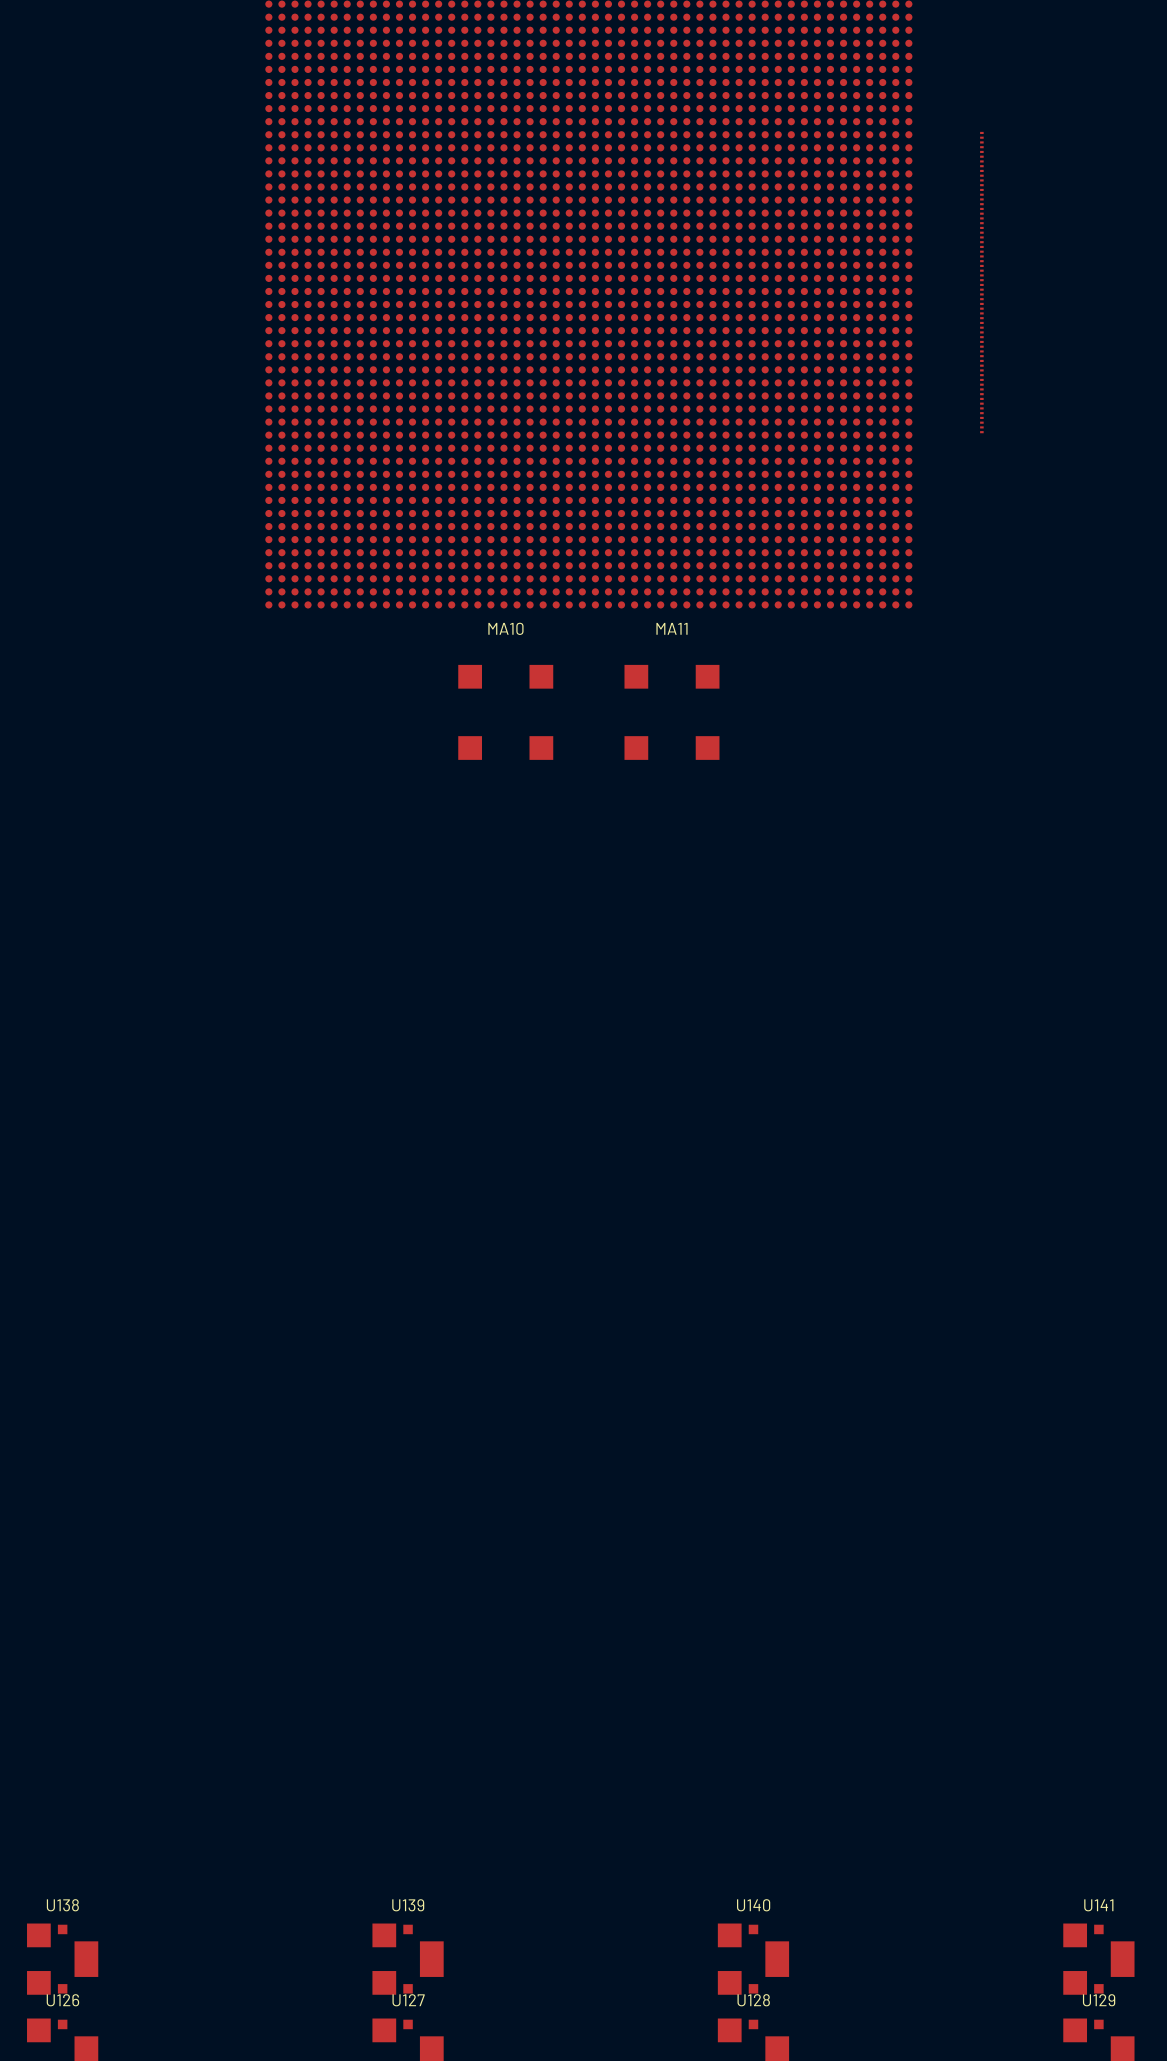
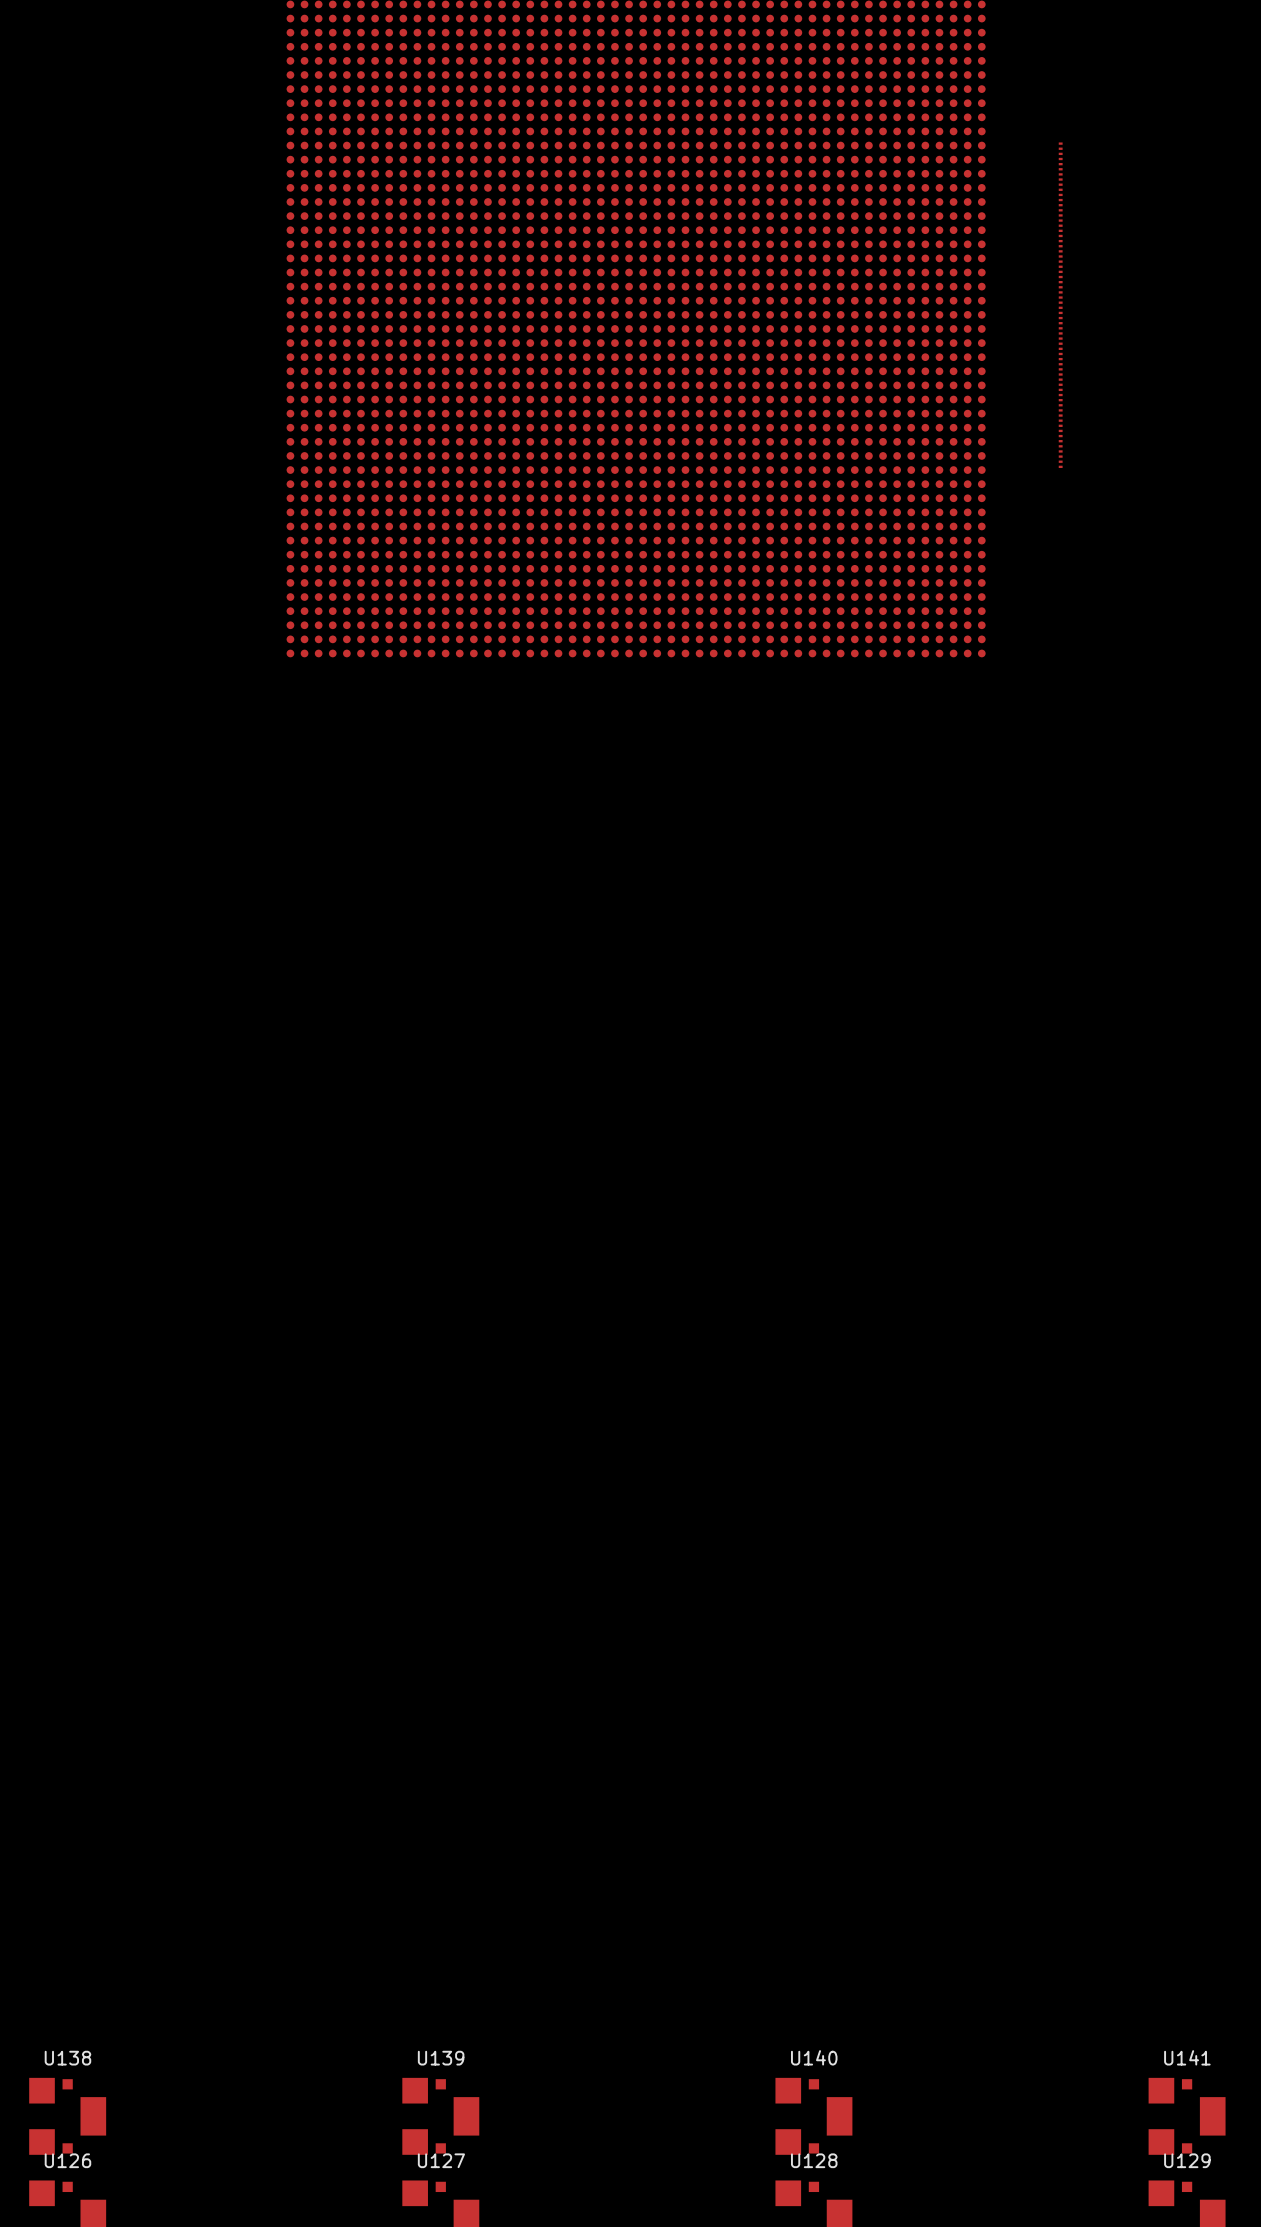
MA10: (505, 712) -> none
MA11: (671, 712) -> none

